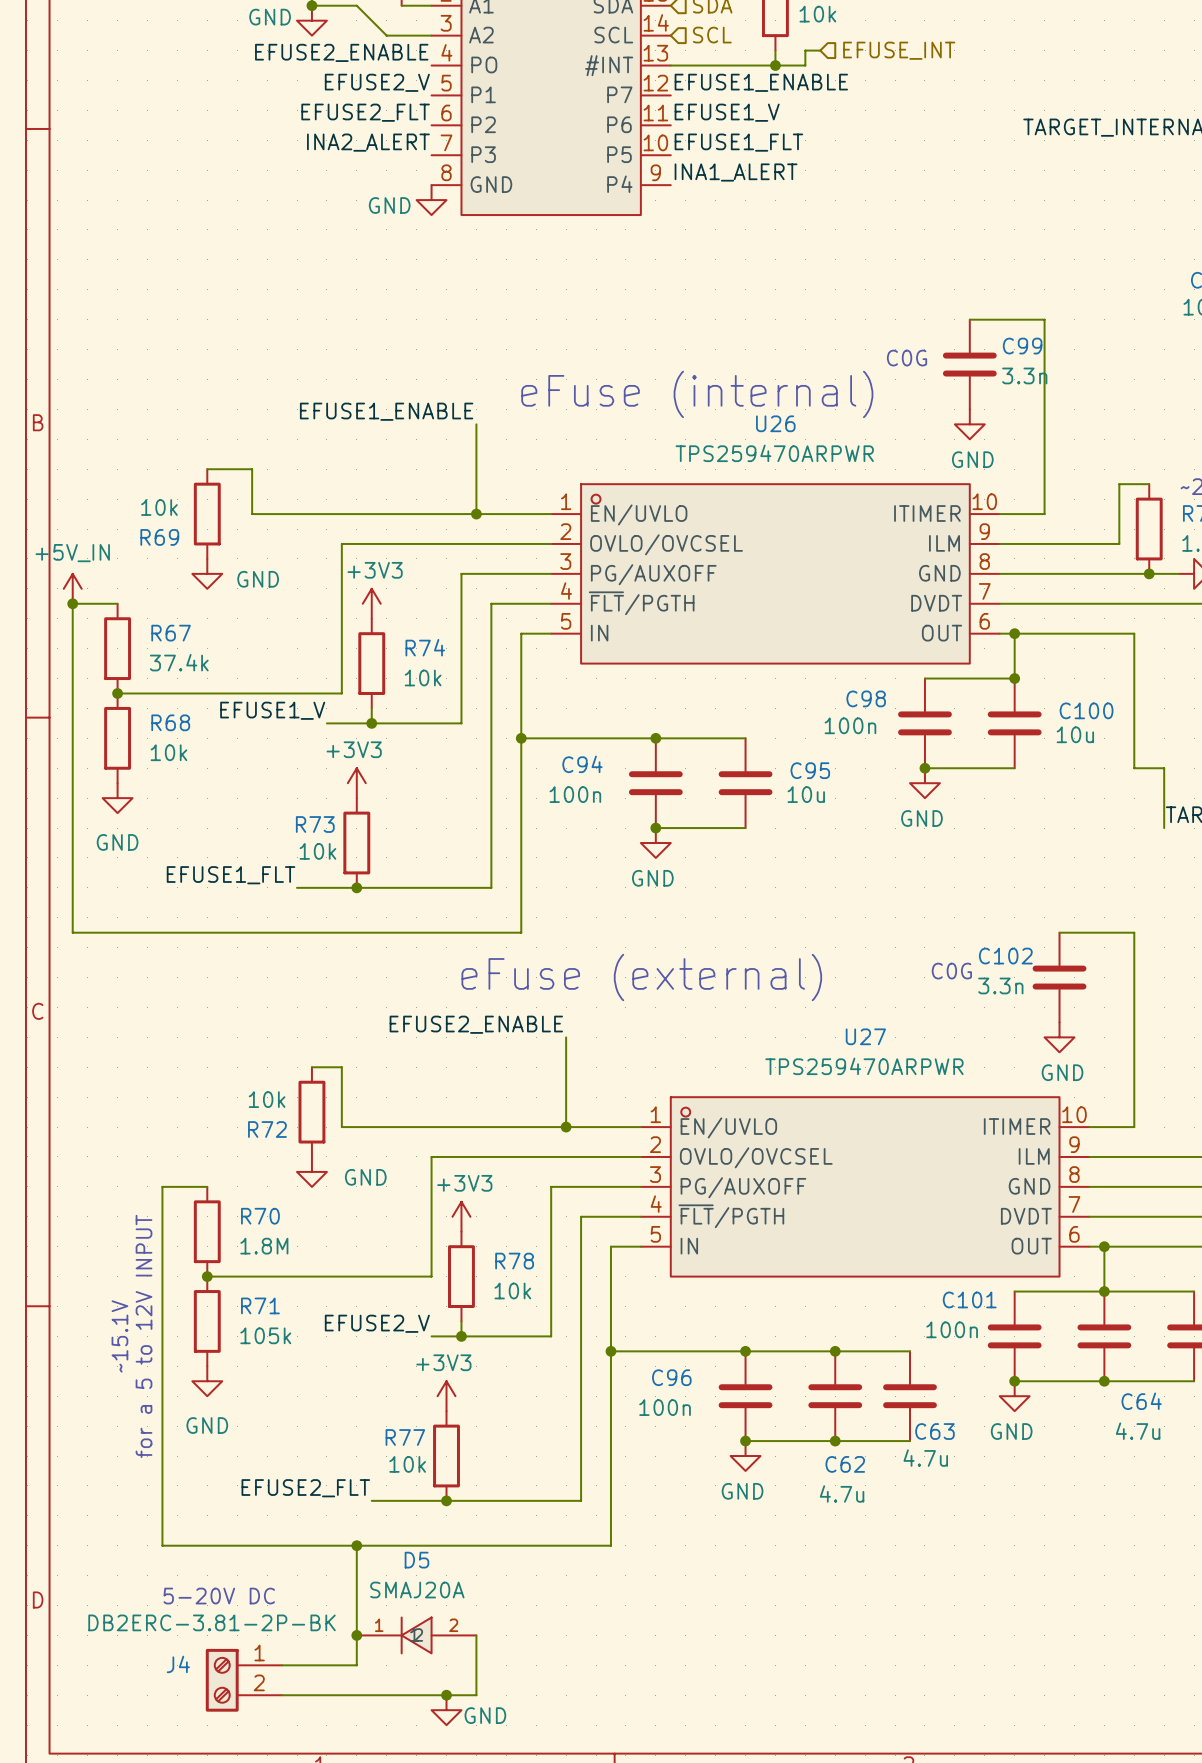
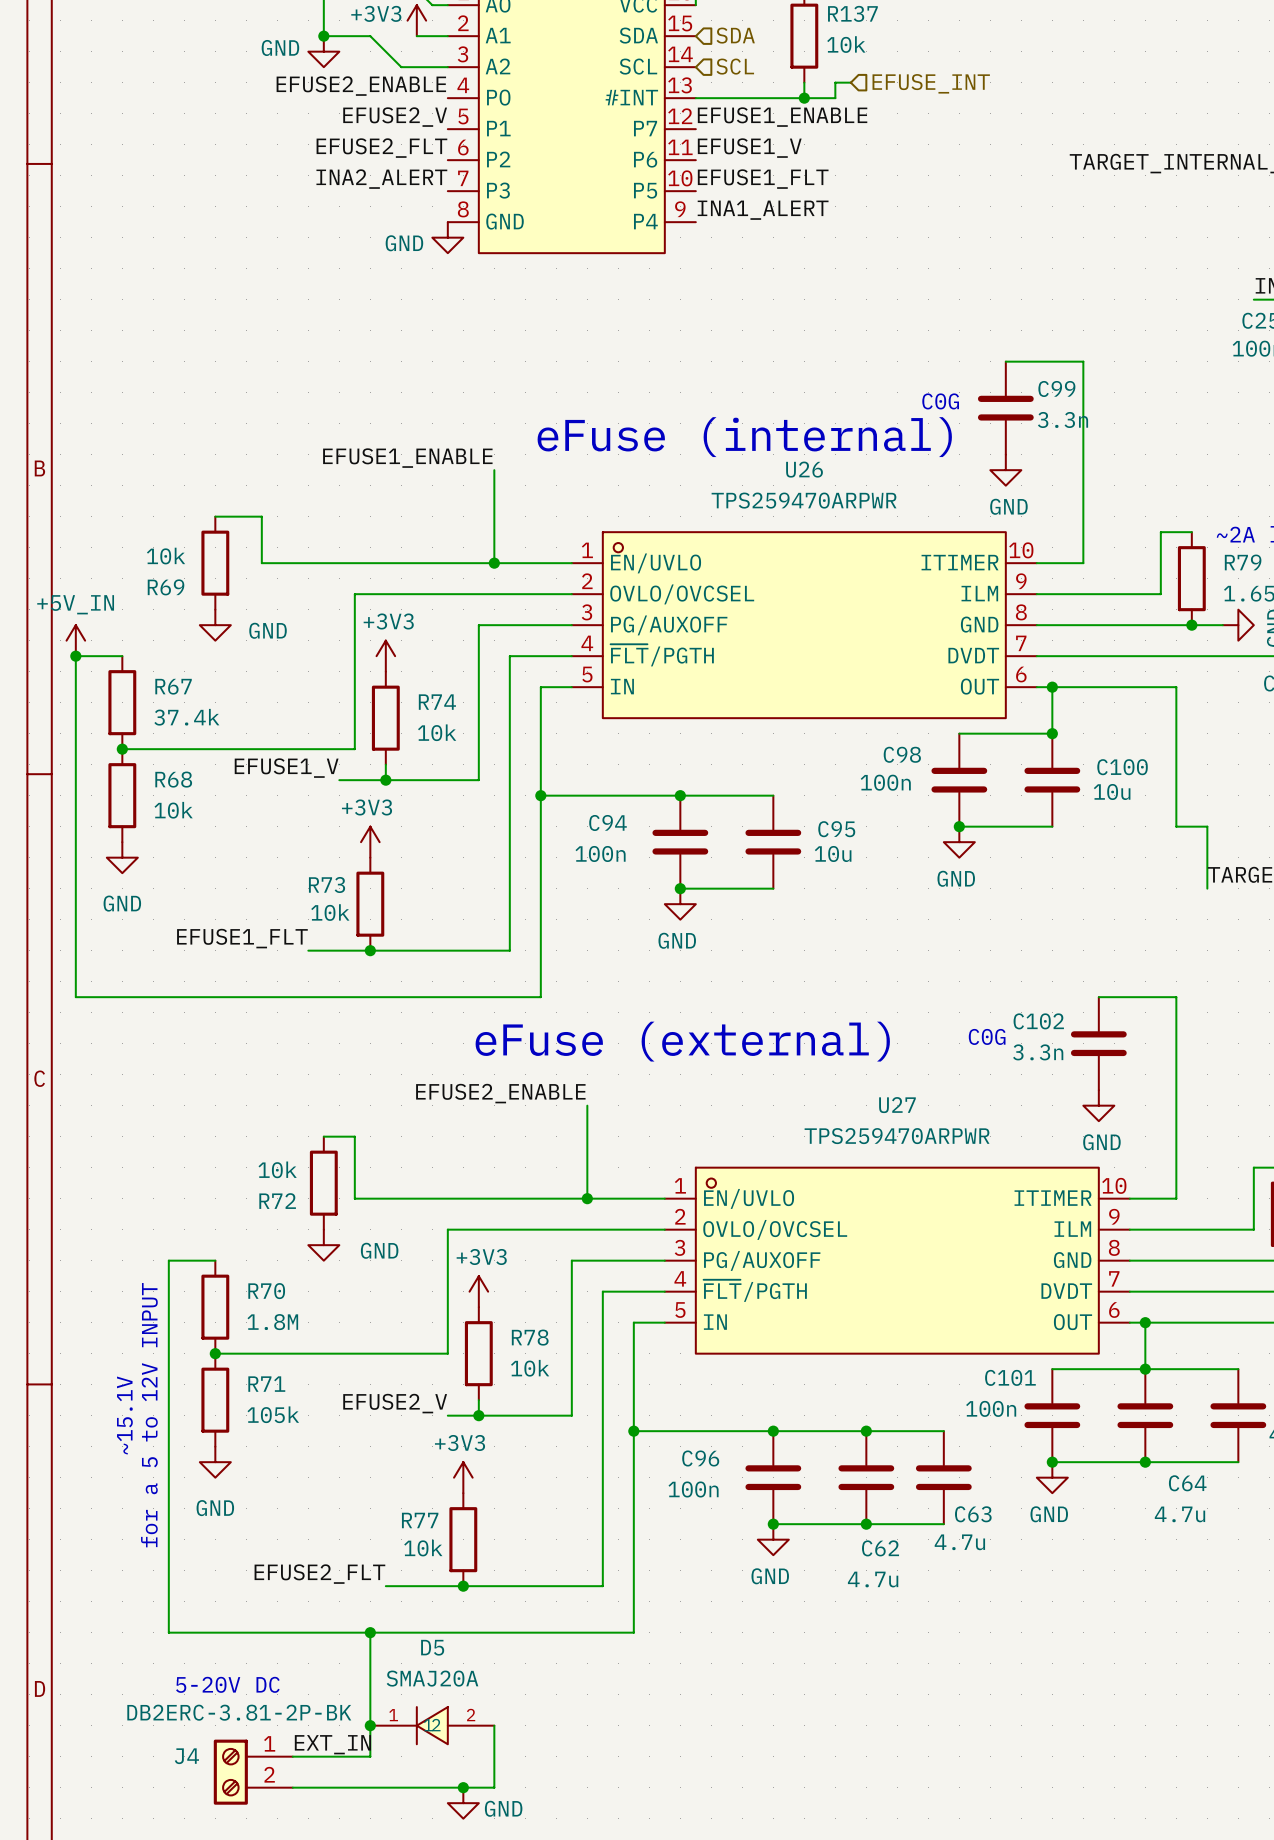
label: none -> EXT_IN (332, 1744)

